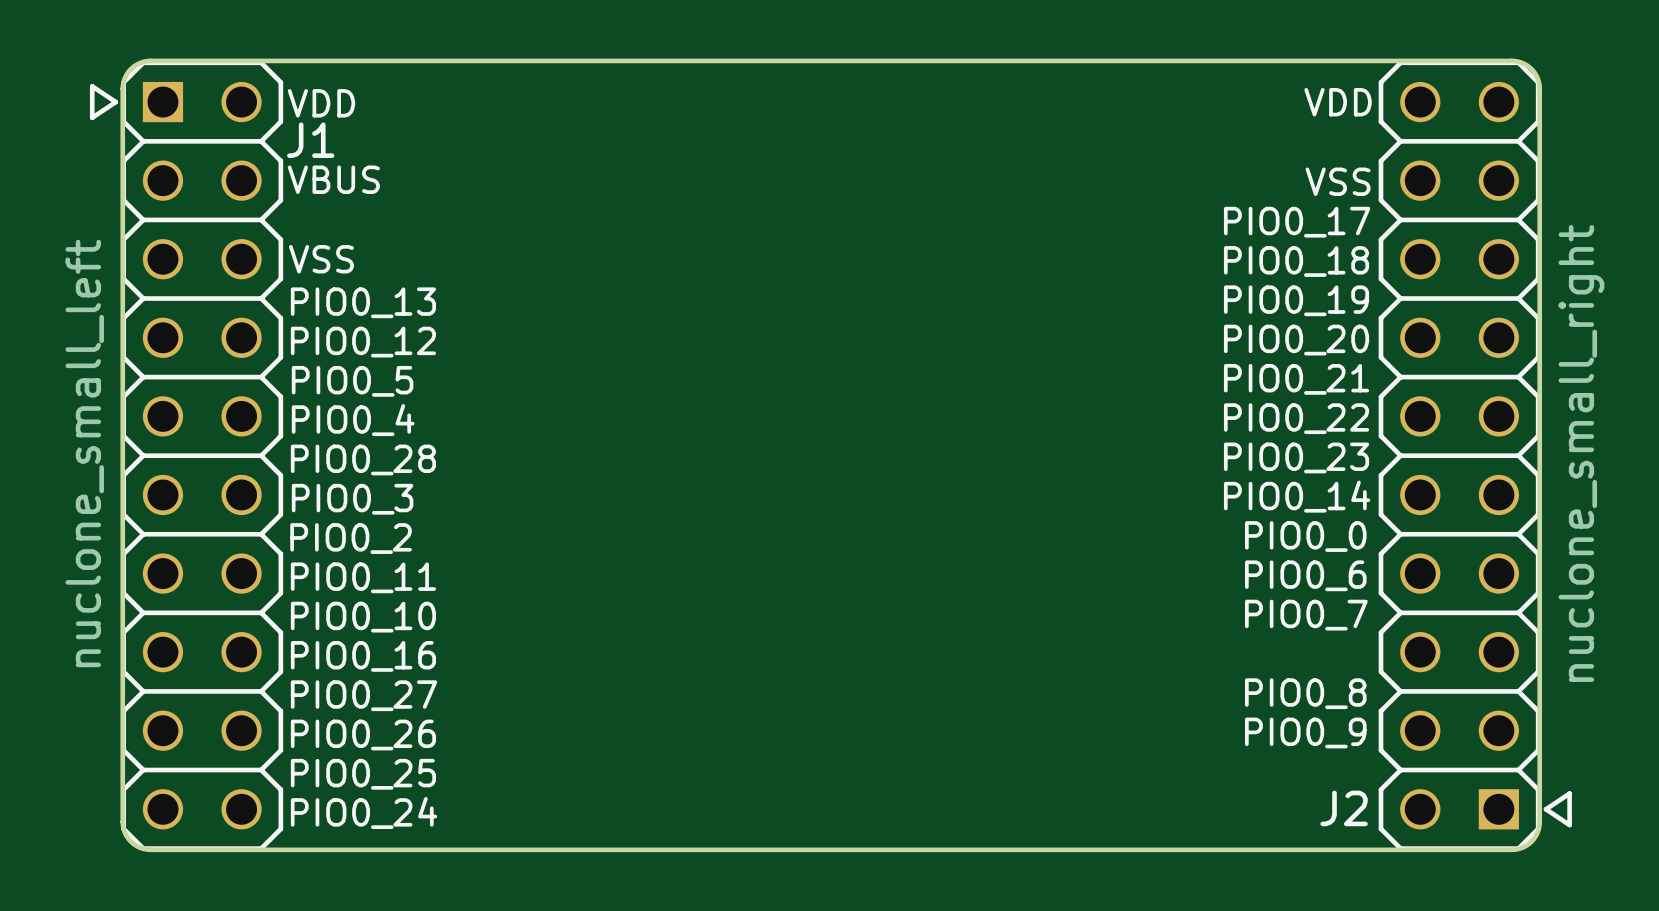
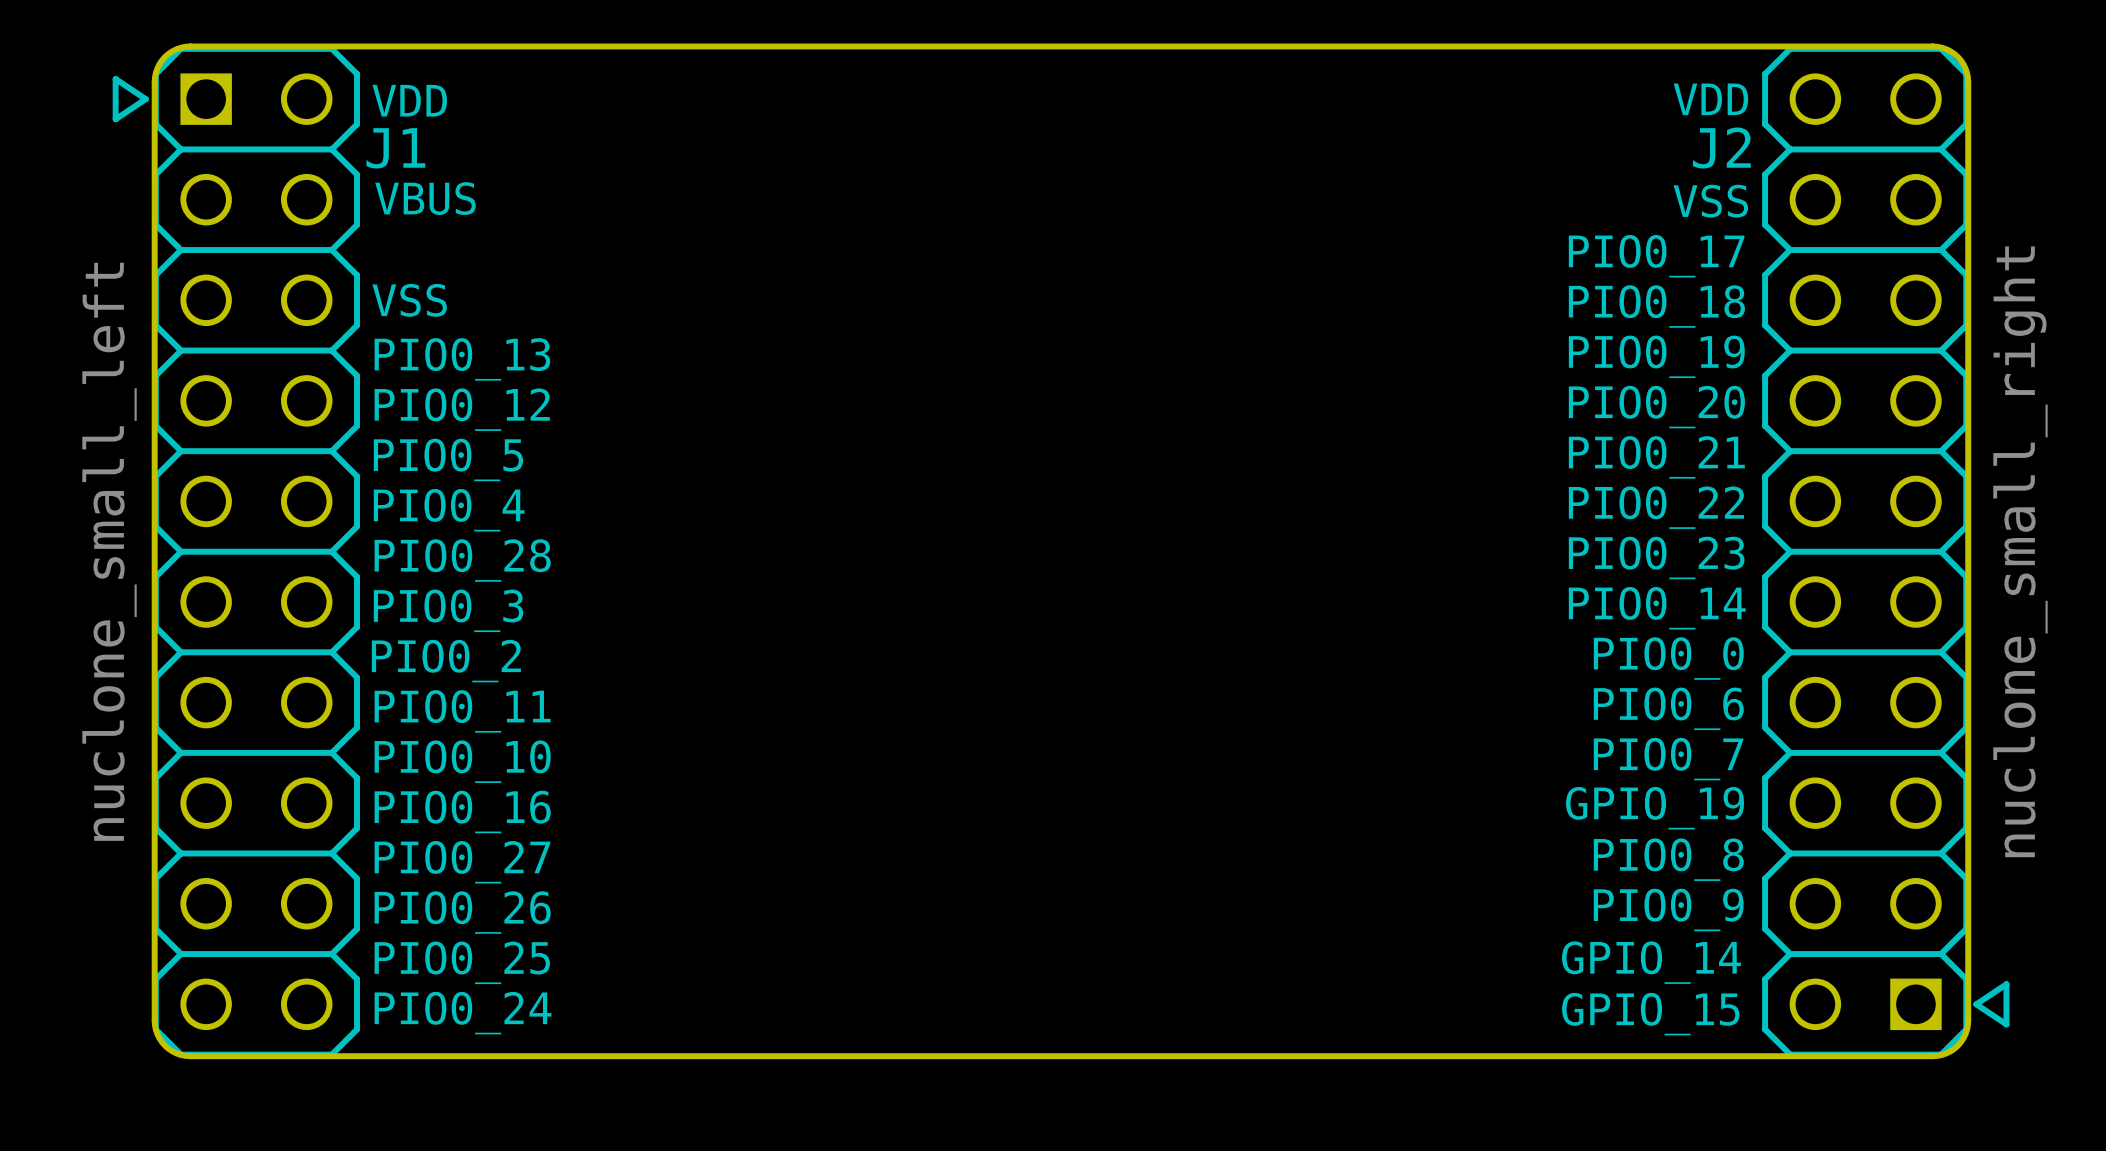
text: none -> GPIO_19 (1655, 808)
text: none -> GPIO_14 (1651, 962)
J2 name position: J2 (1344, 808) -> J2 (1721, 147)
text: none -> GPIO_15 (1650, 1014)

